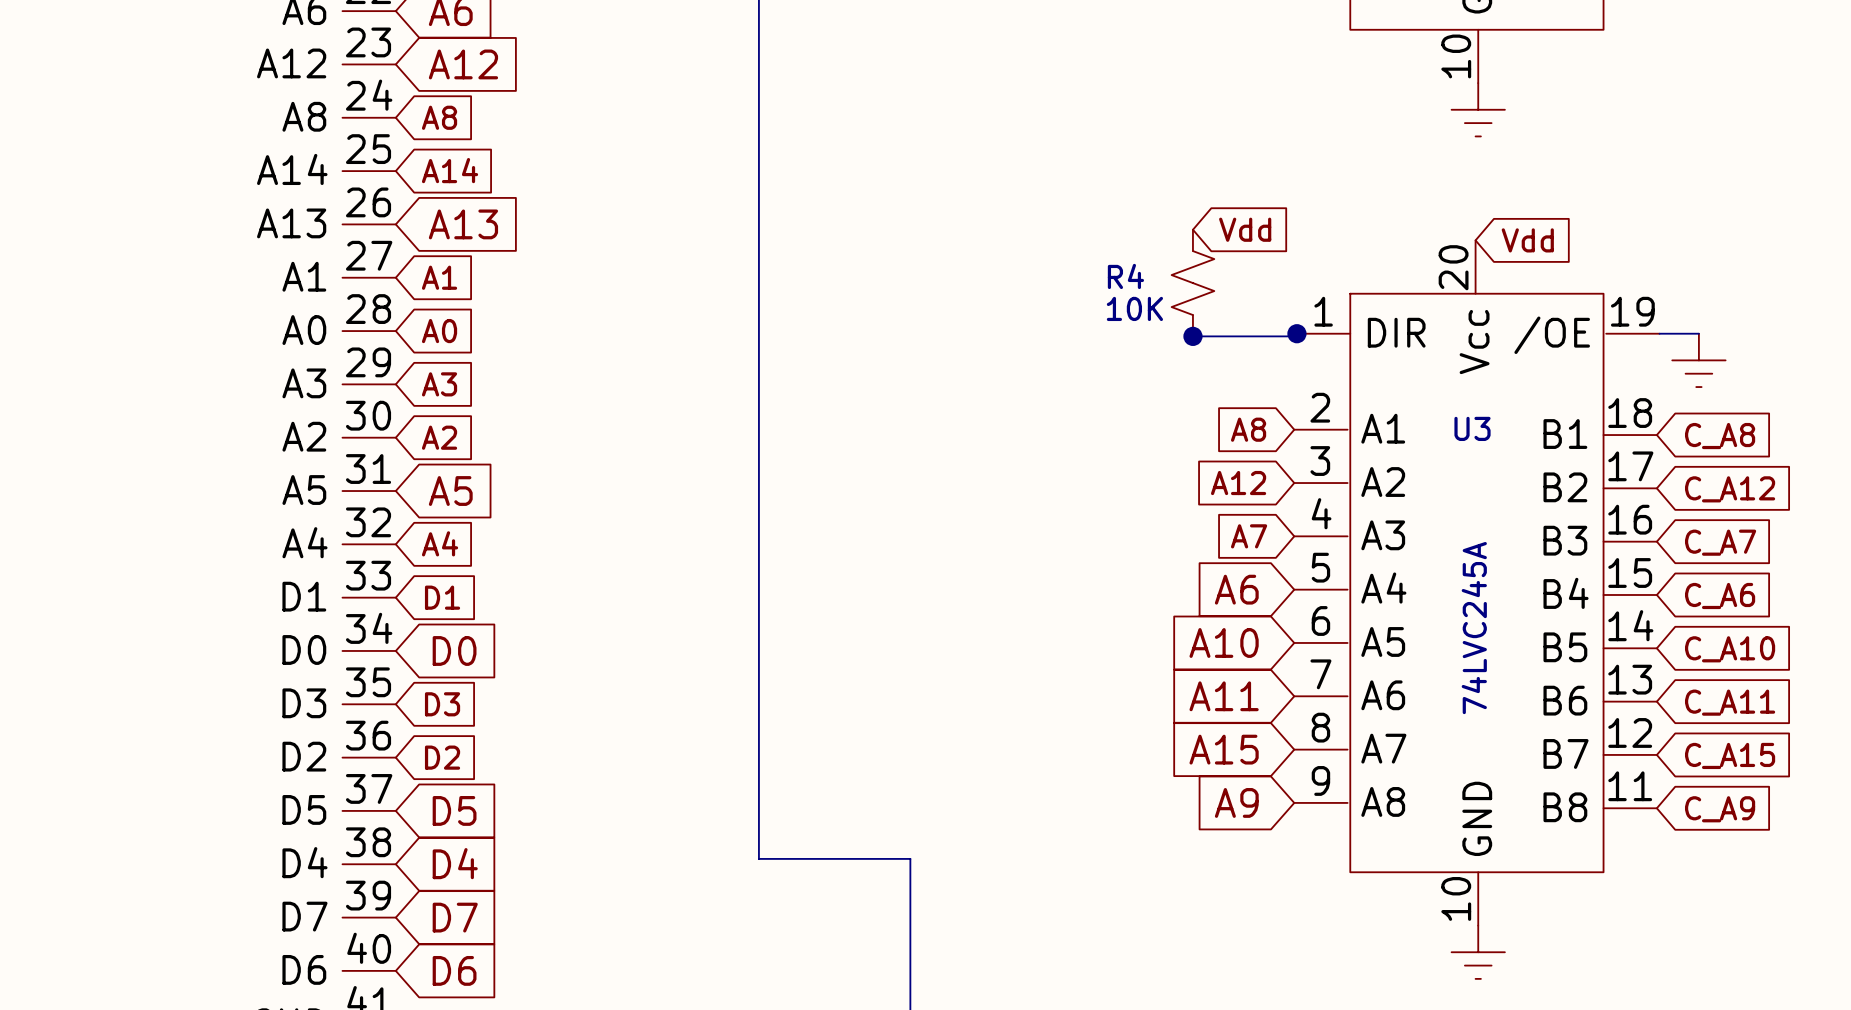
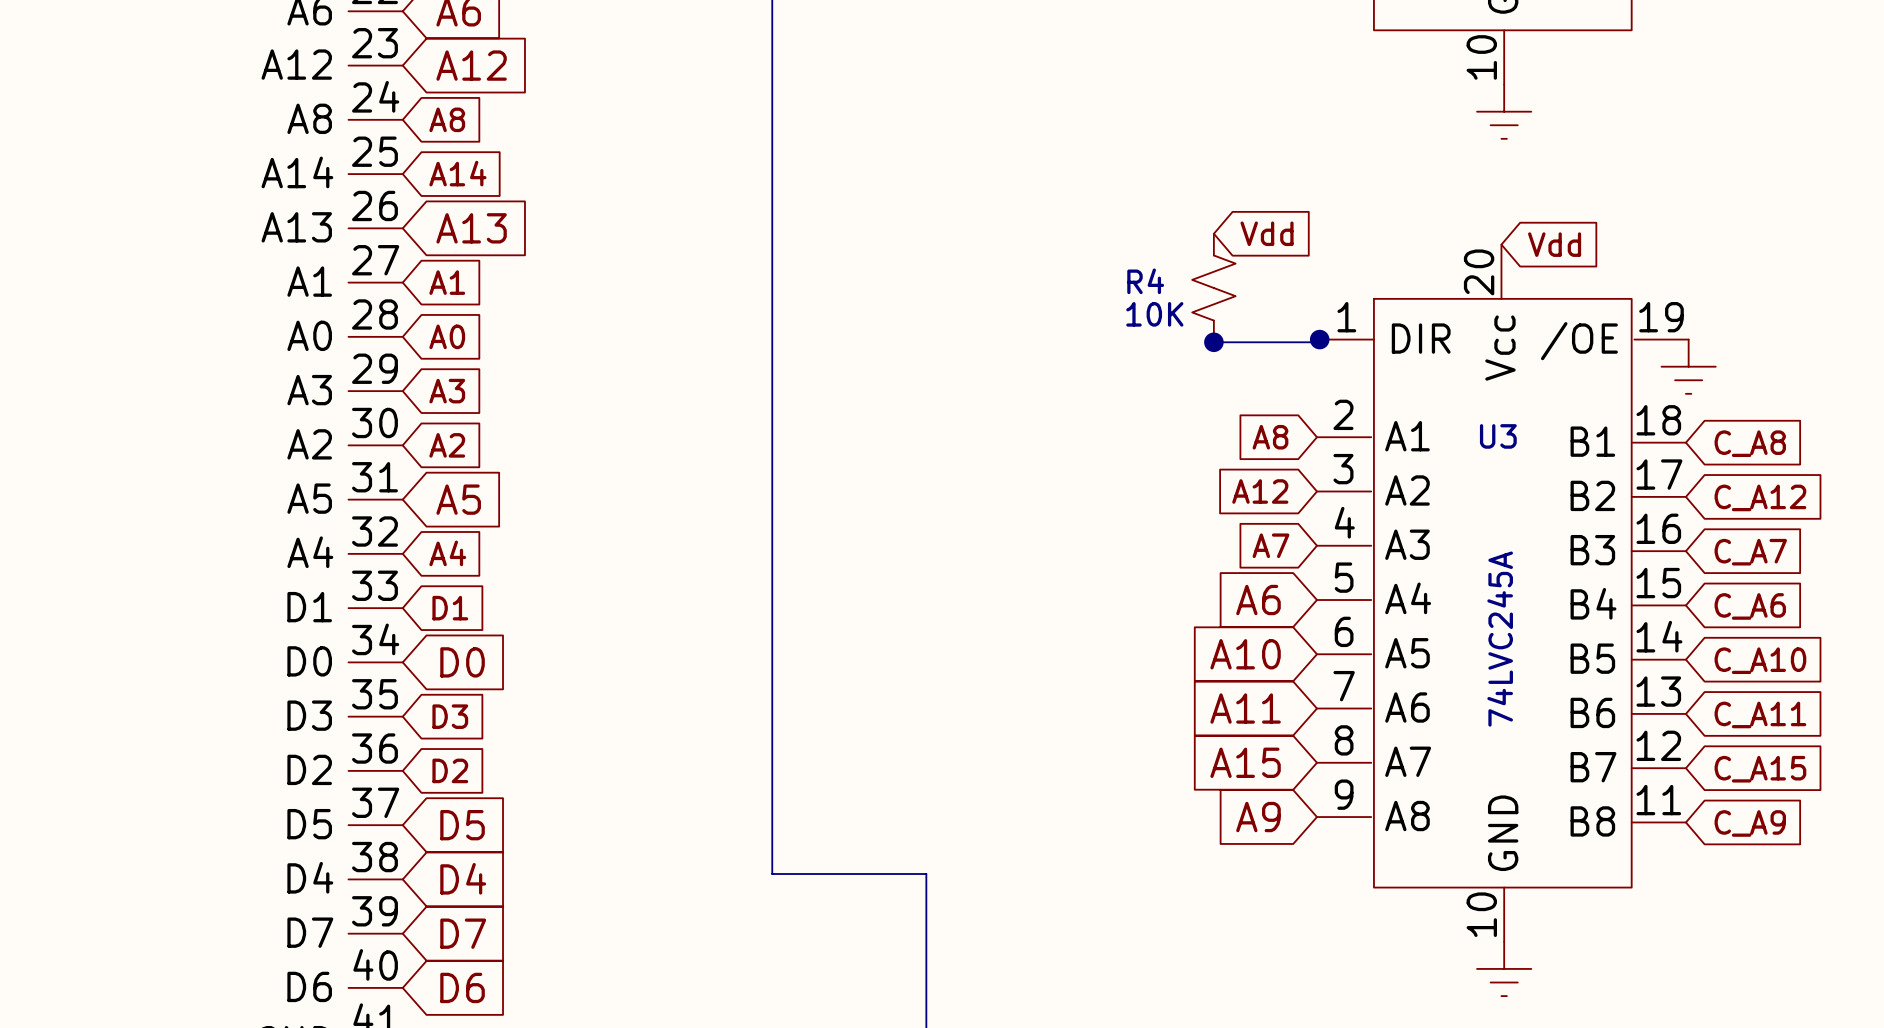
wire: (1659, 333) (1698, 333) -> none
power symbol position: (1698, 360) -> (1688, 366)

